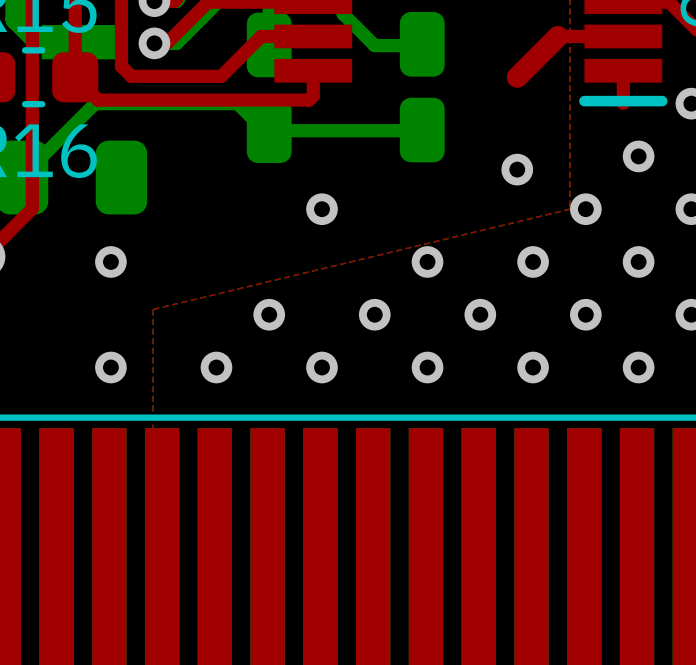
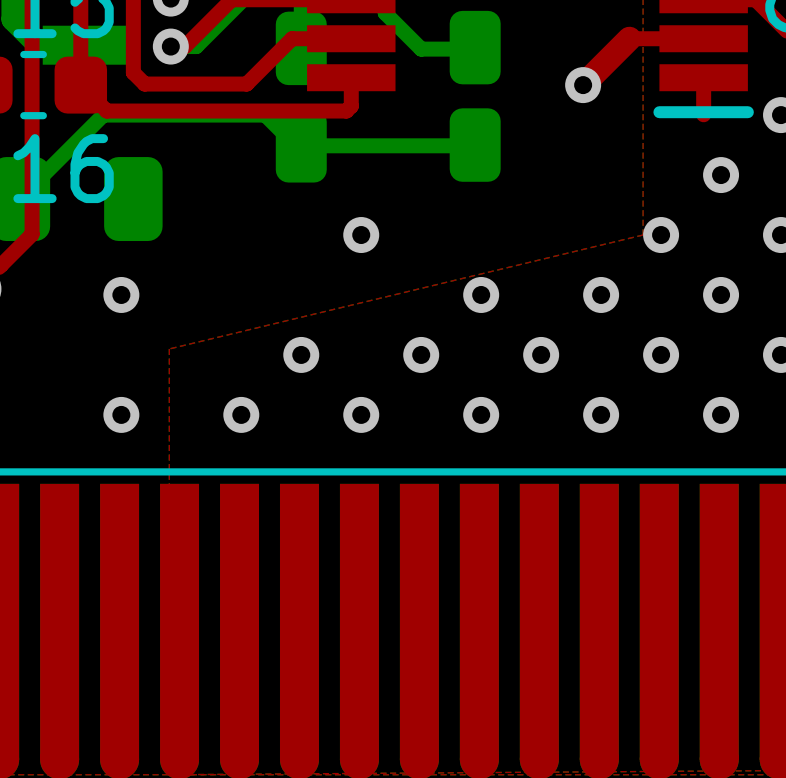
via: none -> (583, 85)
via: (517, 169) -> none

